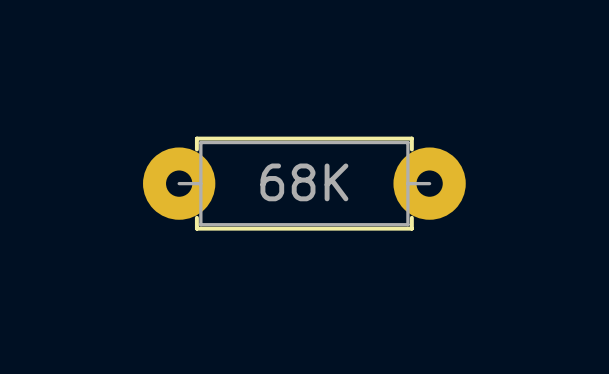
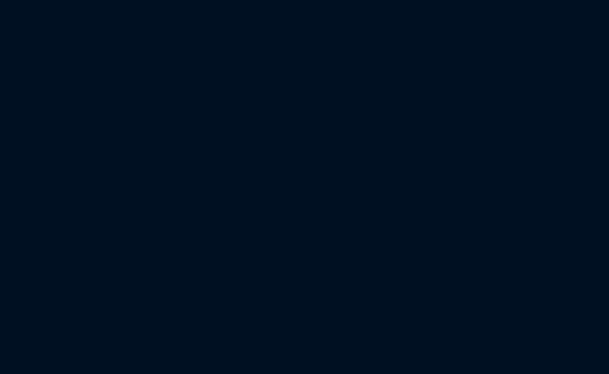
part: 68K (304, 183) -> none

